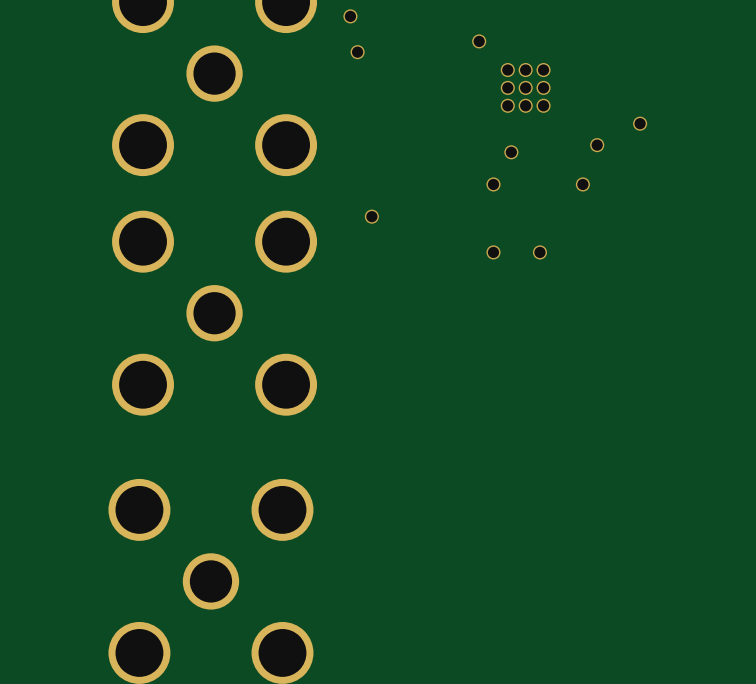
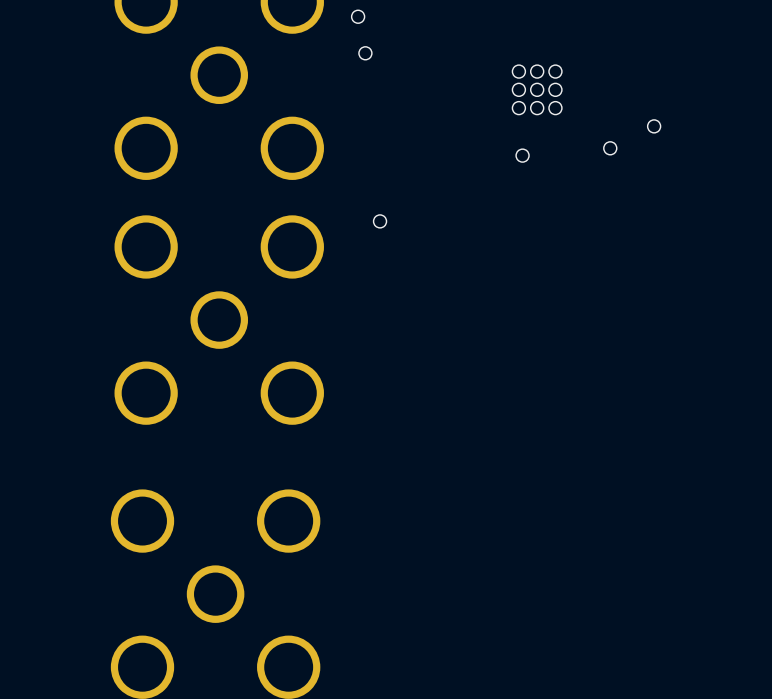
via: (479, 41) -> none
via: (493, 184) -> none
via: (582, 184) -> none
via: (493, 252) -> none
via: (539, 252) -> none

